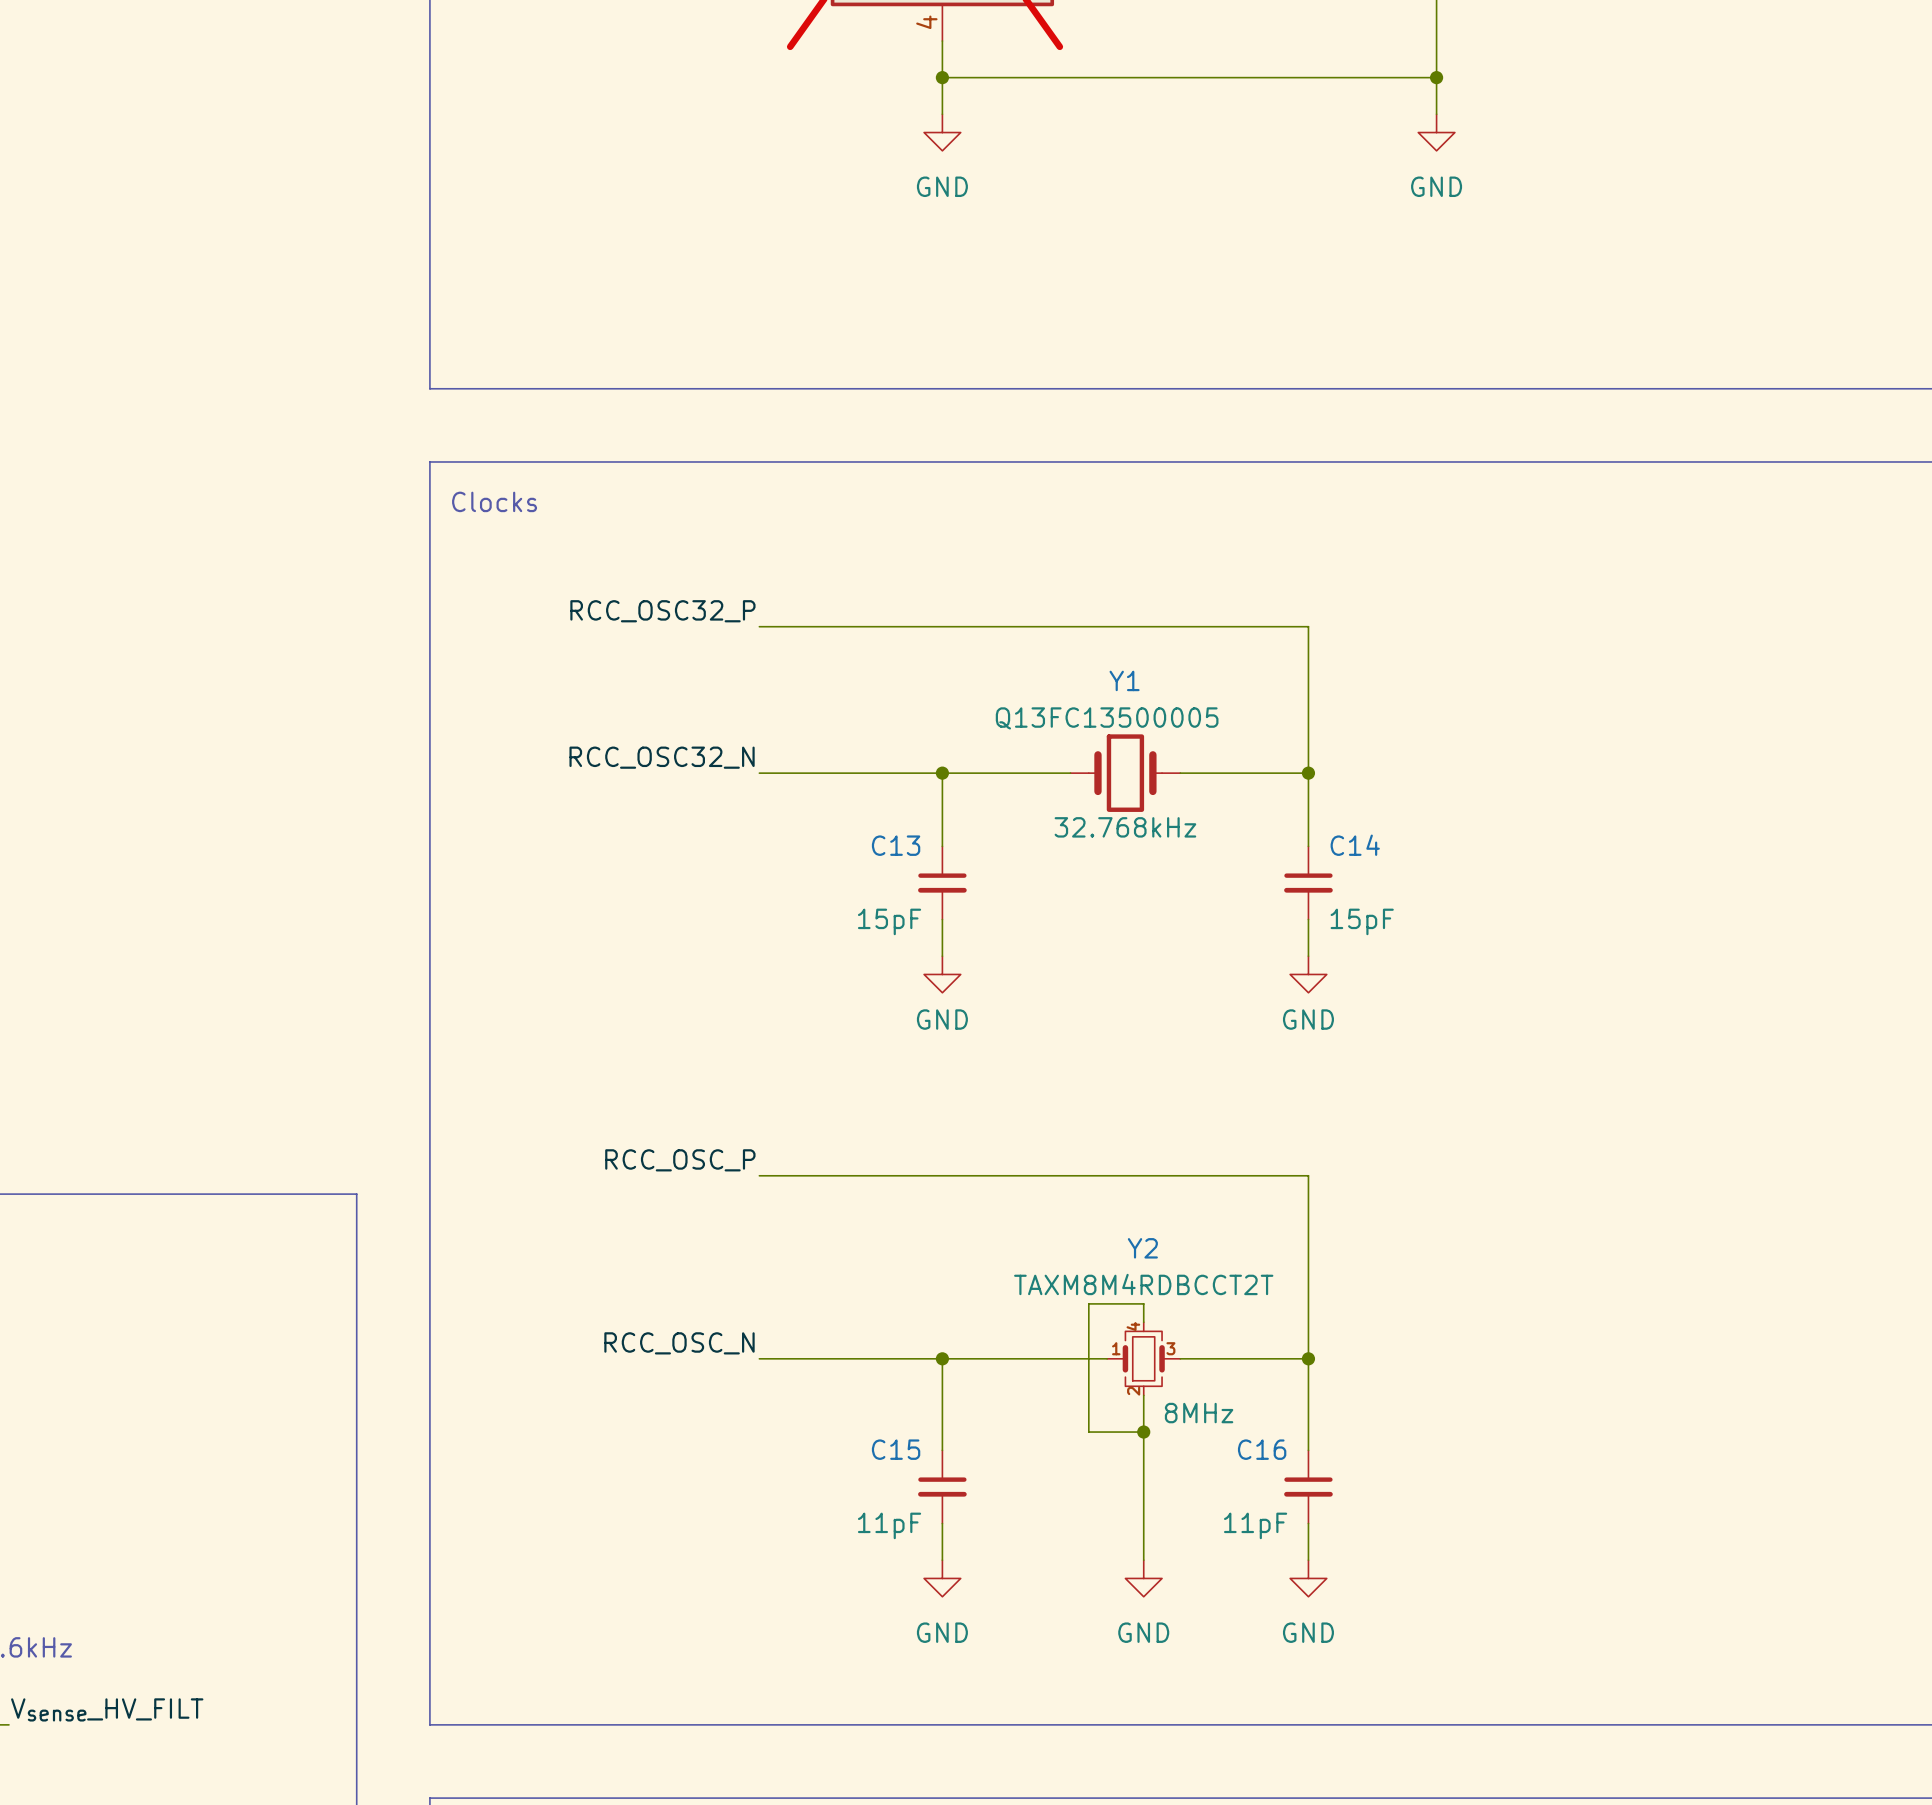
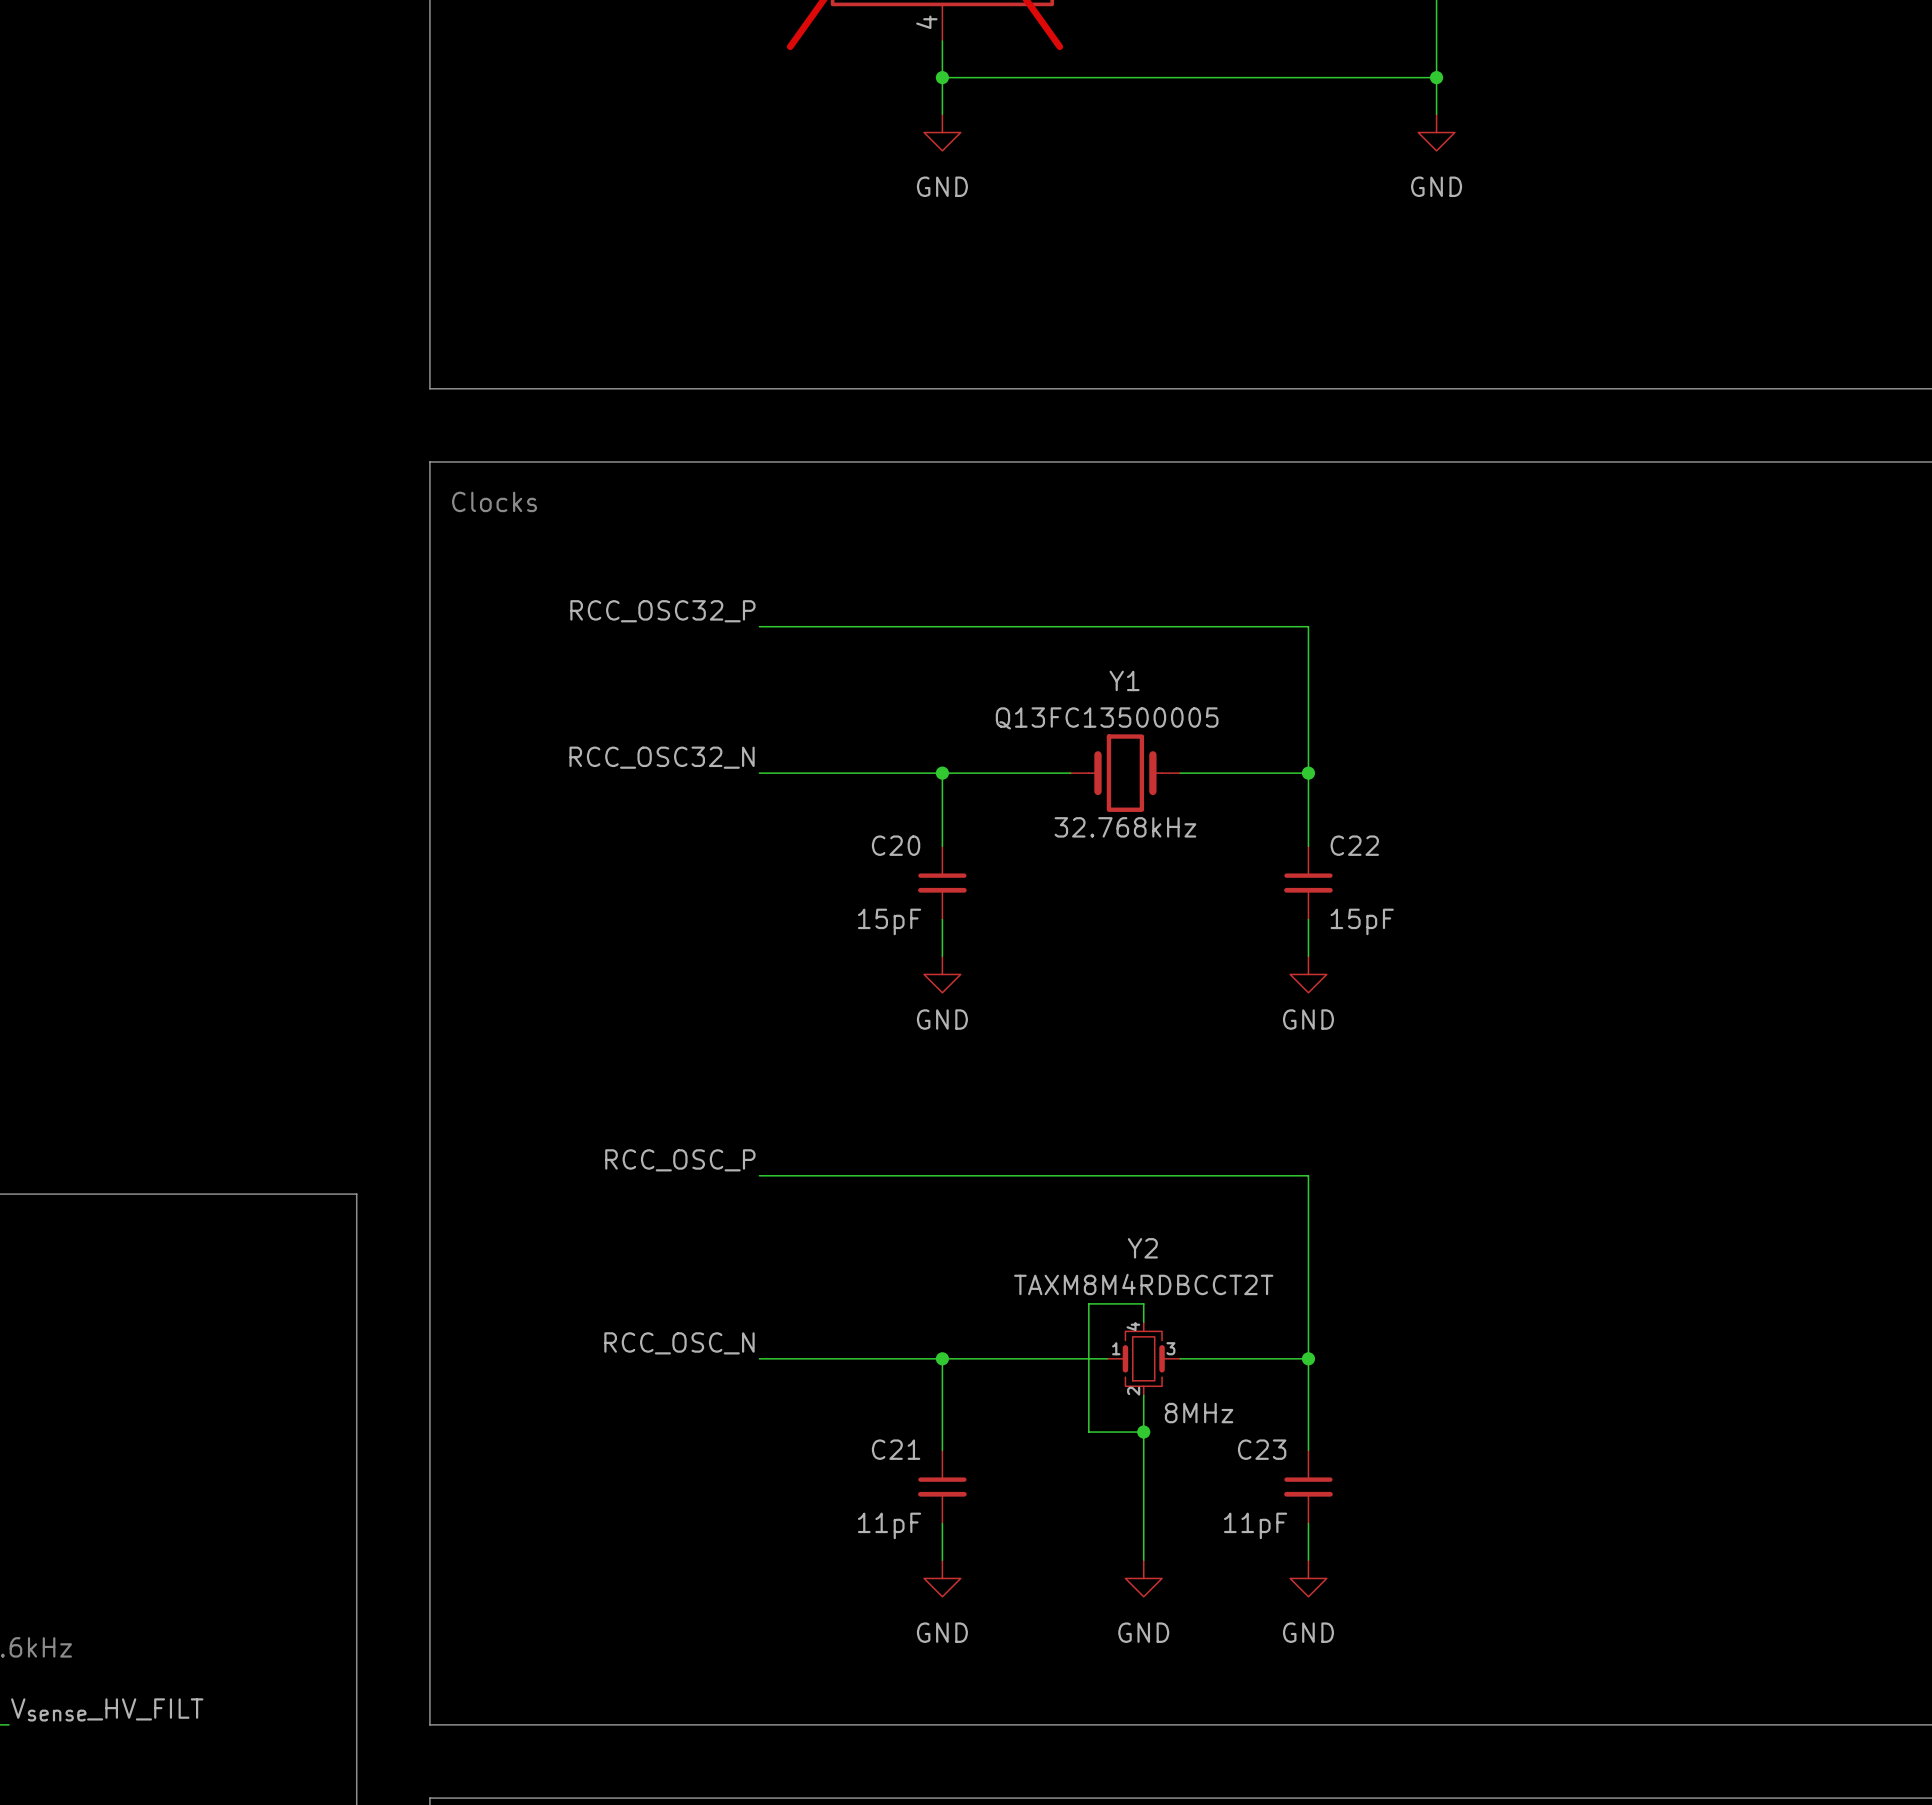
C13 name: C13 (896, 845) -> C20 (896, 845)
C14 name: C14 (1355, 845) -> C22 (1354, 845)
C15 name: C15 (896, 1449) -> C21 (896, 1449)
C16 name: C16 (1262, 1449) -> C23 (1262, 1449)

